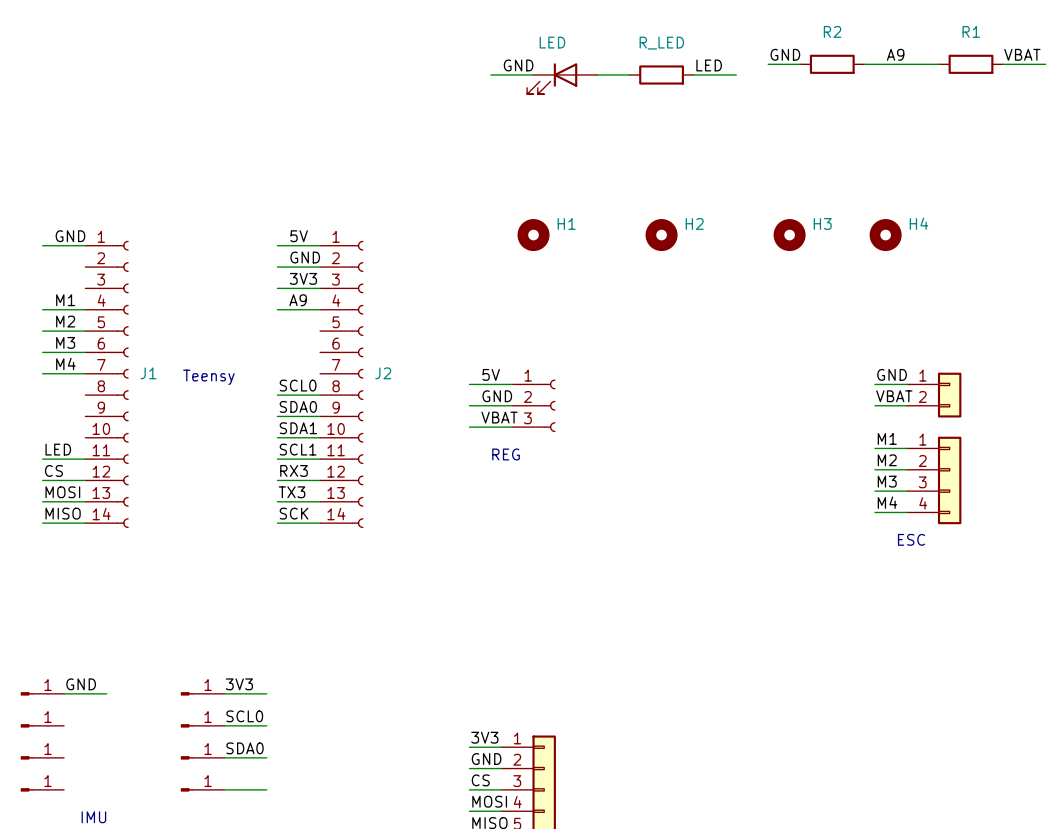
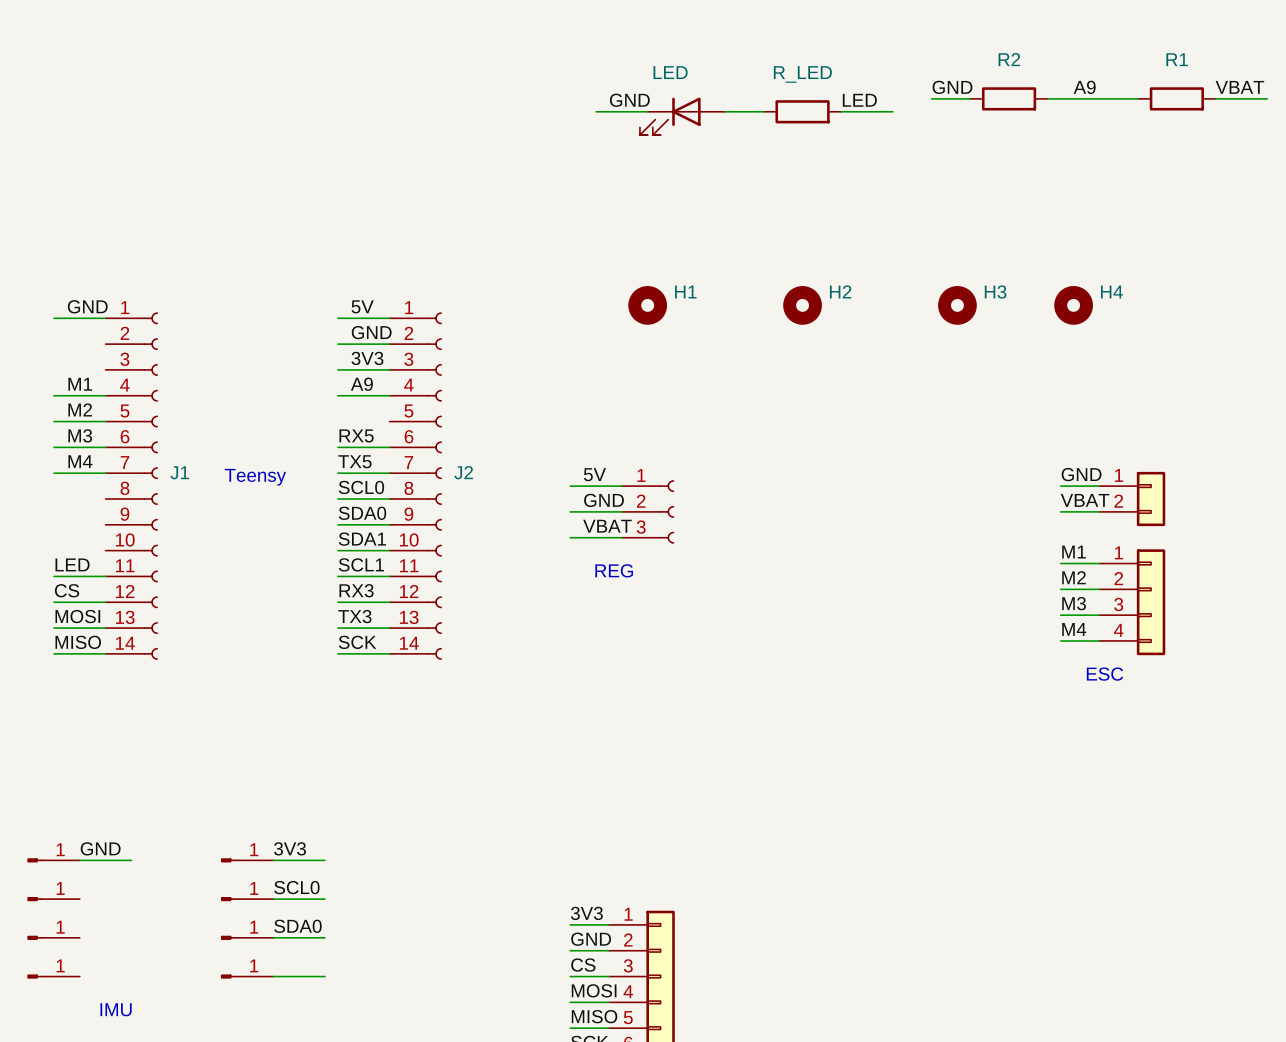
label: none -> RX5 (356, 435)
wire: none -> (337, 447) (389, 447)
label: none -> TX5 (354, 461)
wire: none -> (337, 473) (389, 473)

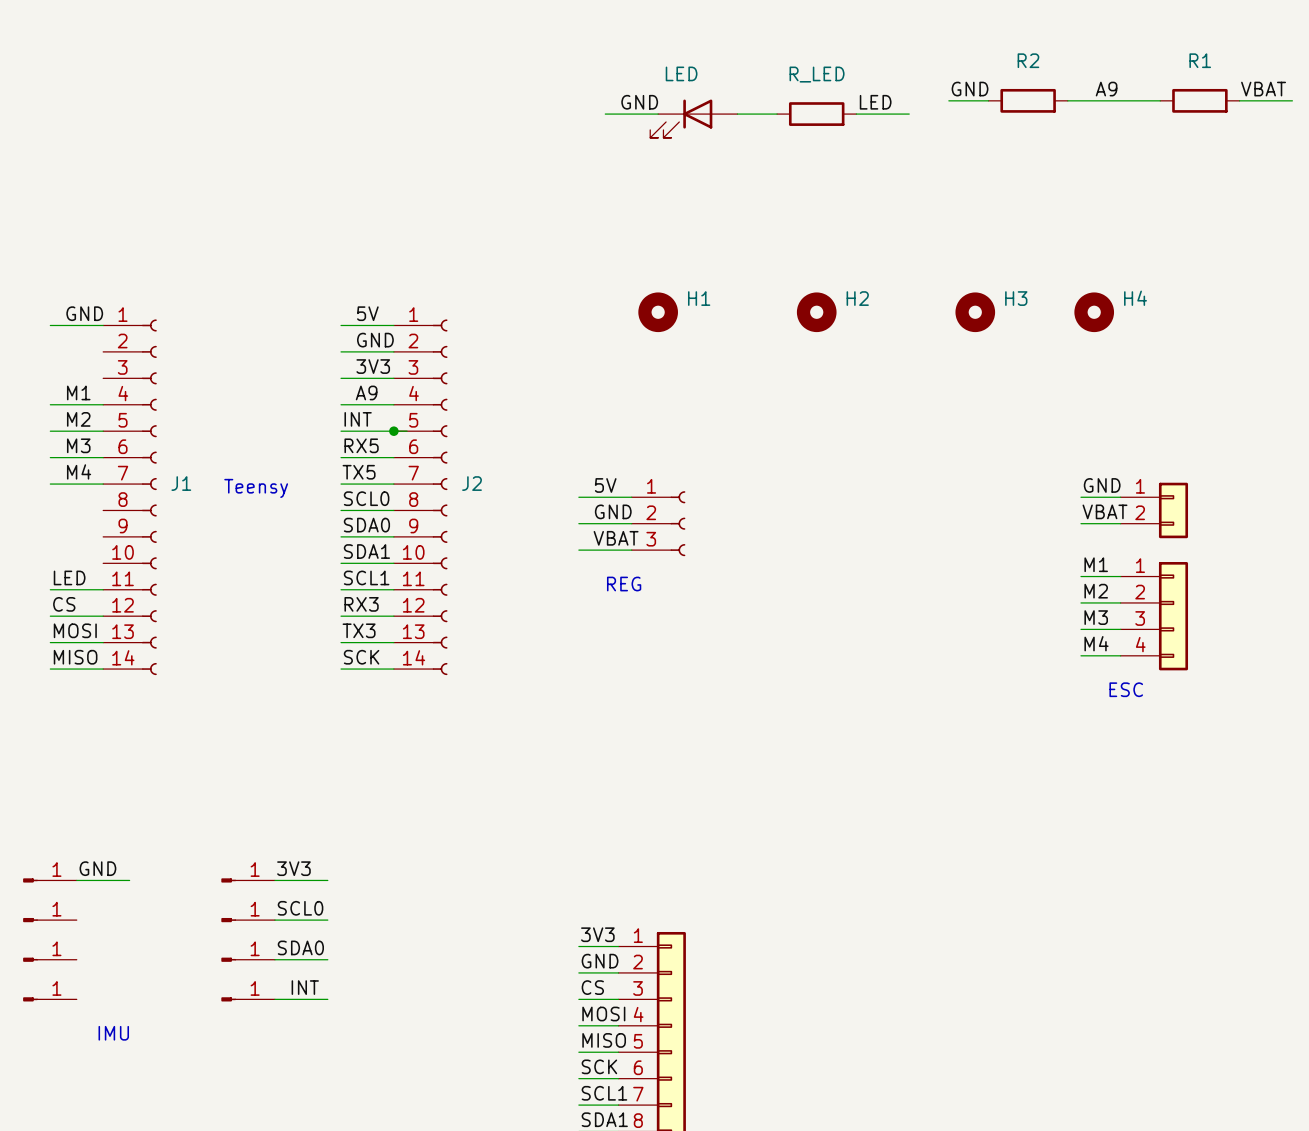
label: none -> INT (358, 419)
wire: none -> (341, 431) (407, 431)
junction: none -> (393, 431)
label: none -> INT (305, 987)

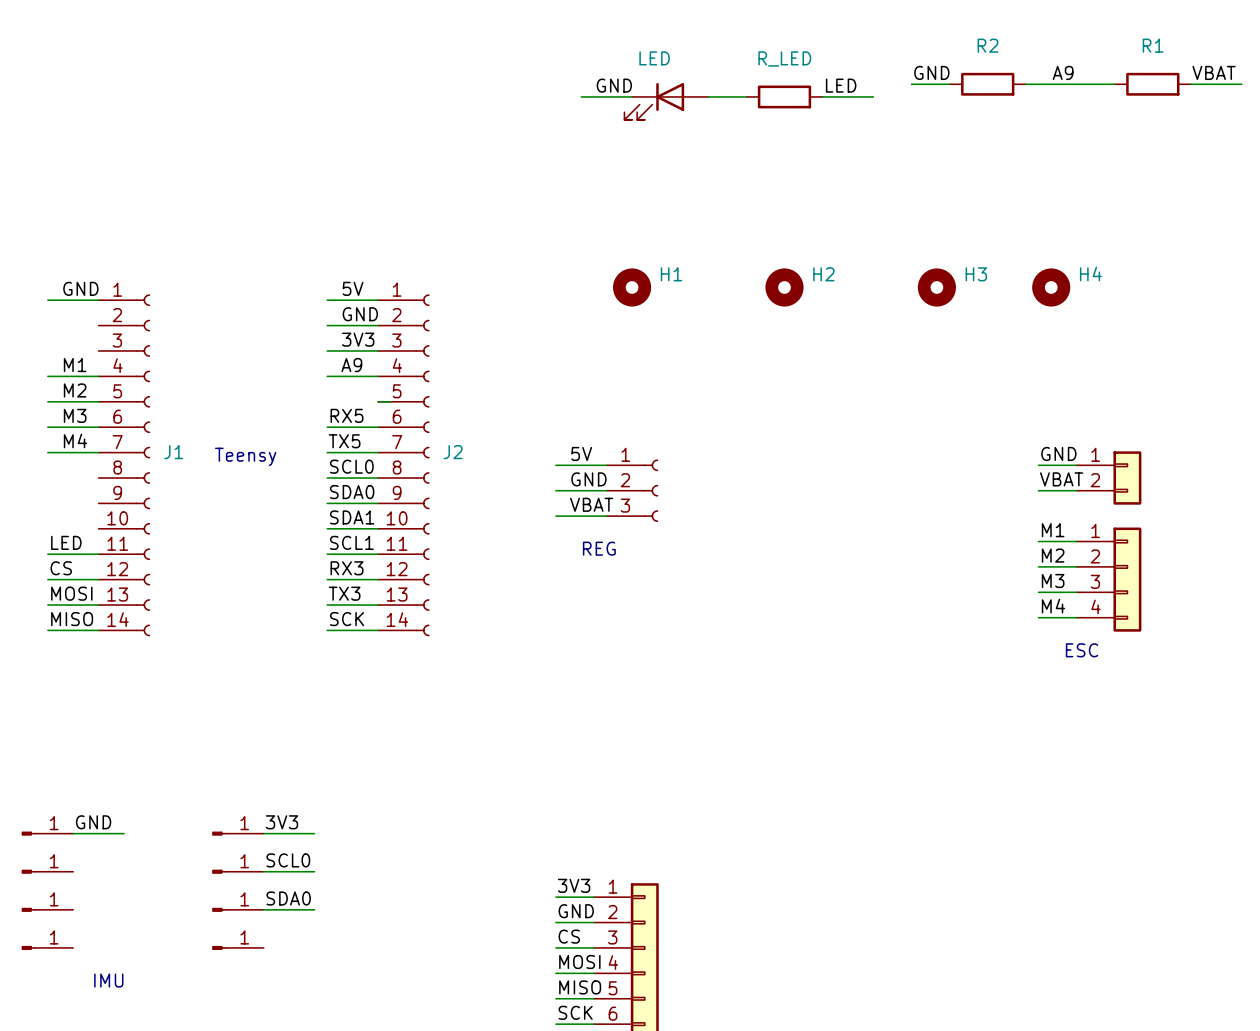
label: INT (358, 419) -> none
wire: (341, 431) (393, 431) -> none
junction: (393, 431) -> none
label: INT (305, 987) -> none
wire: (274, 999) (327, 999) -> none

